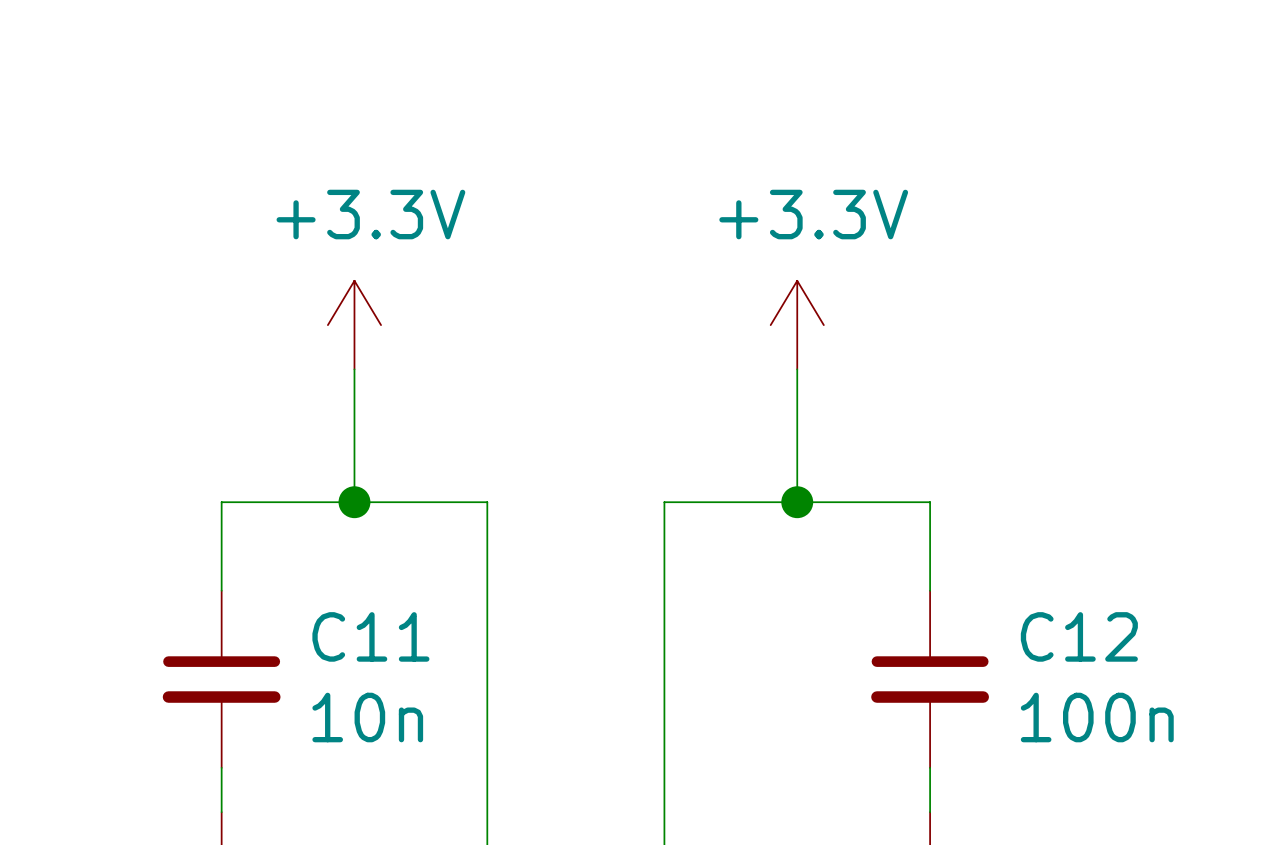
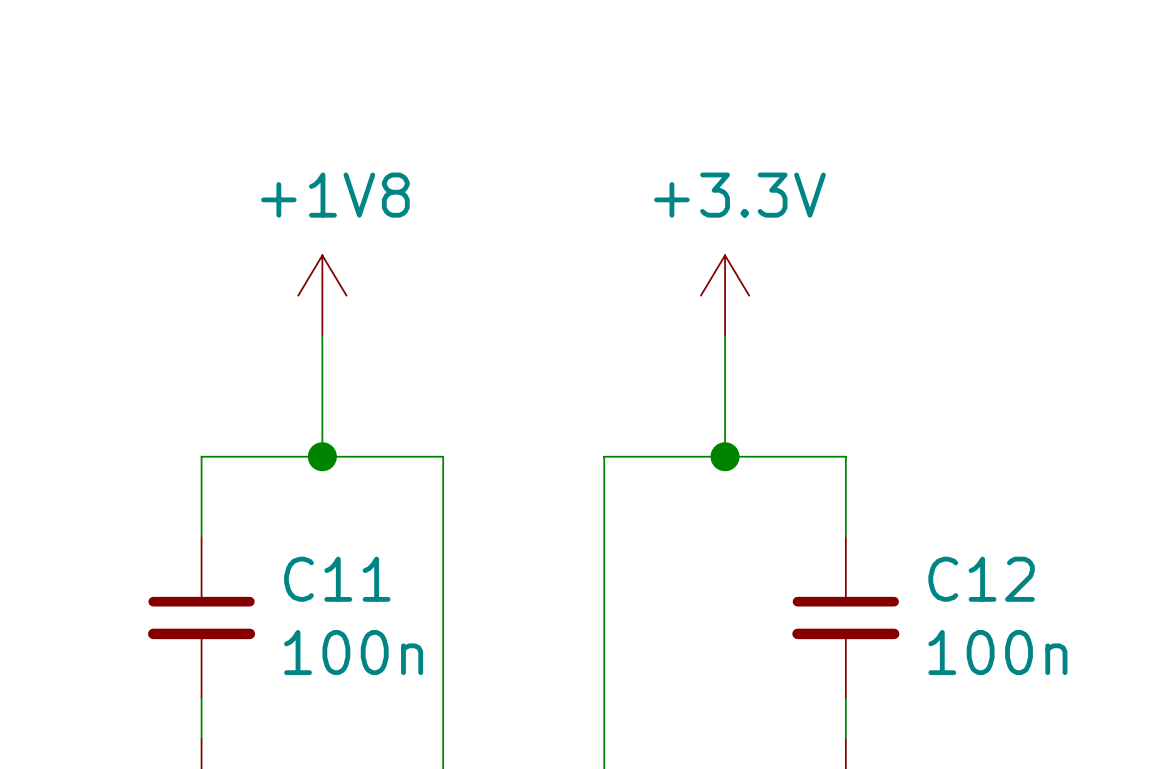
power symbol: +3.3V (354, 325) -> +1V8 (322, 295)
C11 value: 10n (367, 717) -> 100n (353, 652)

